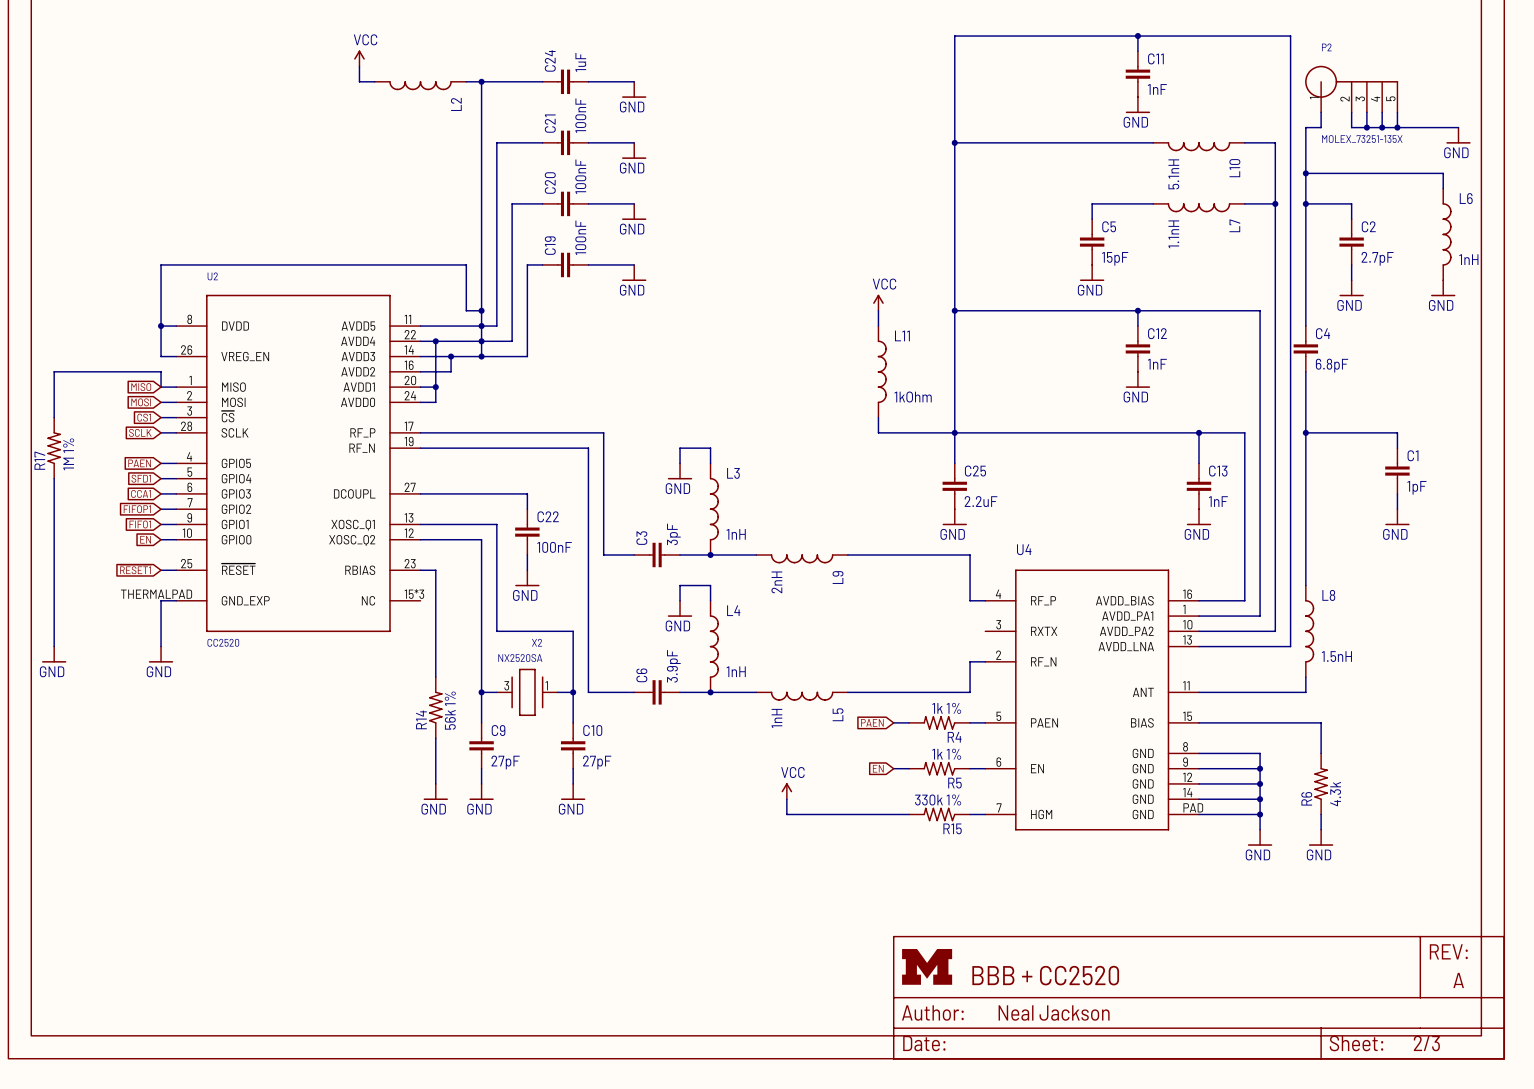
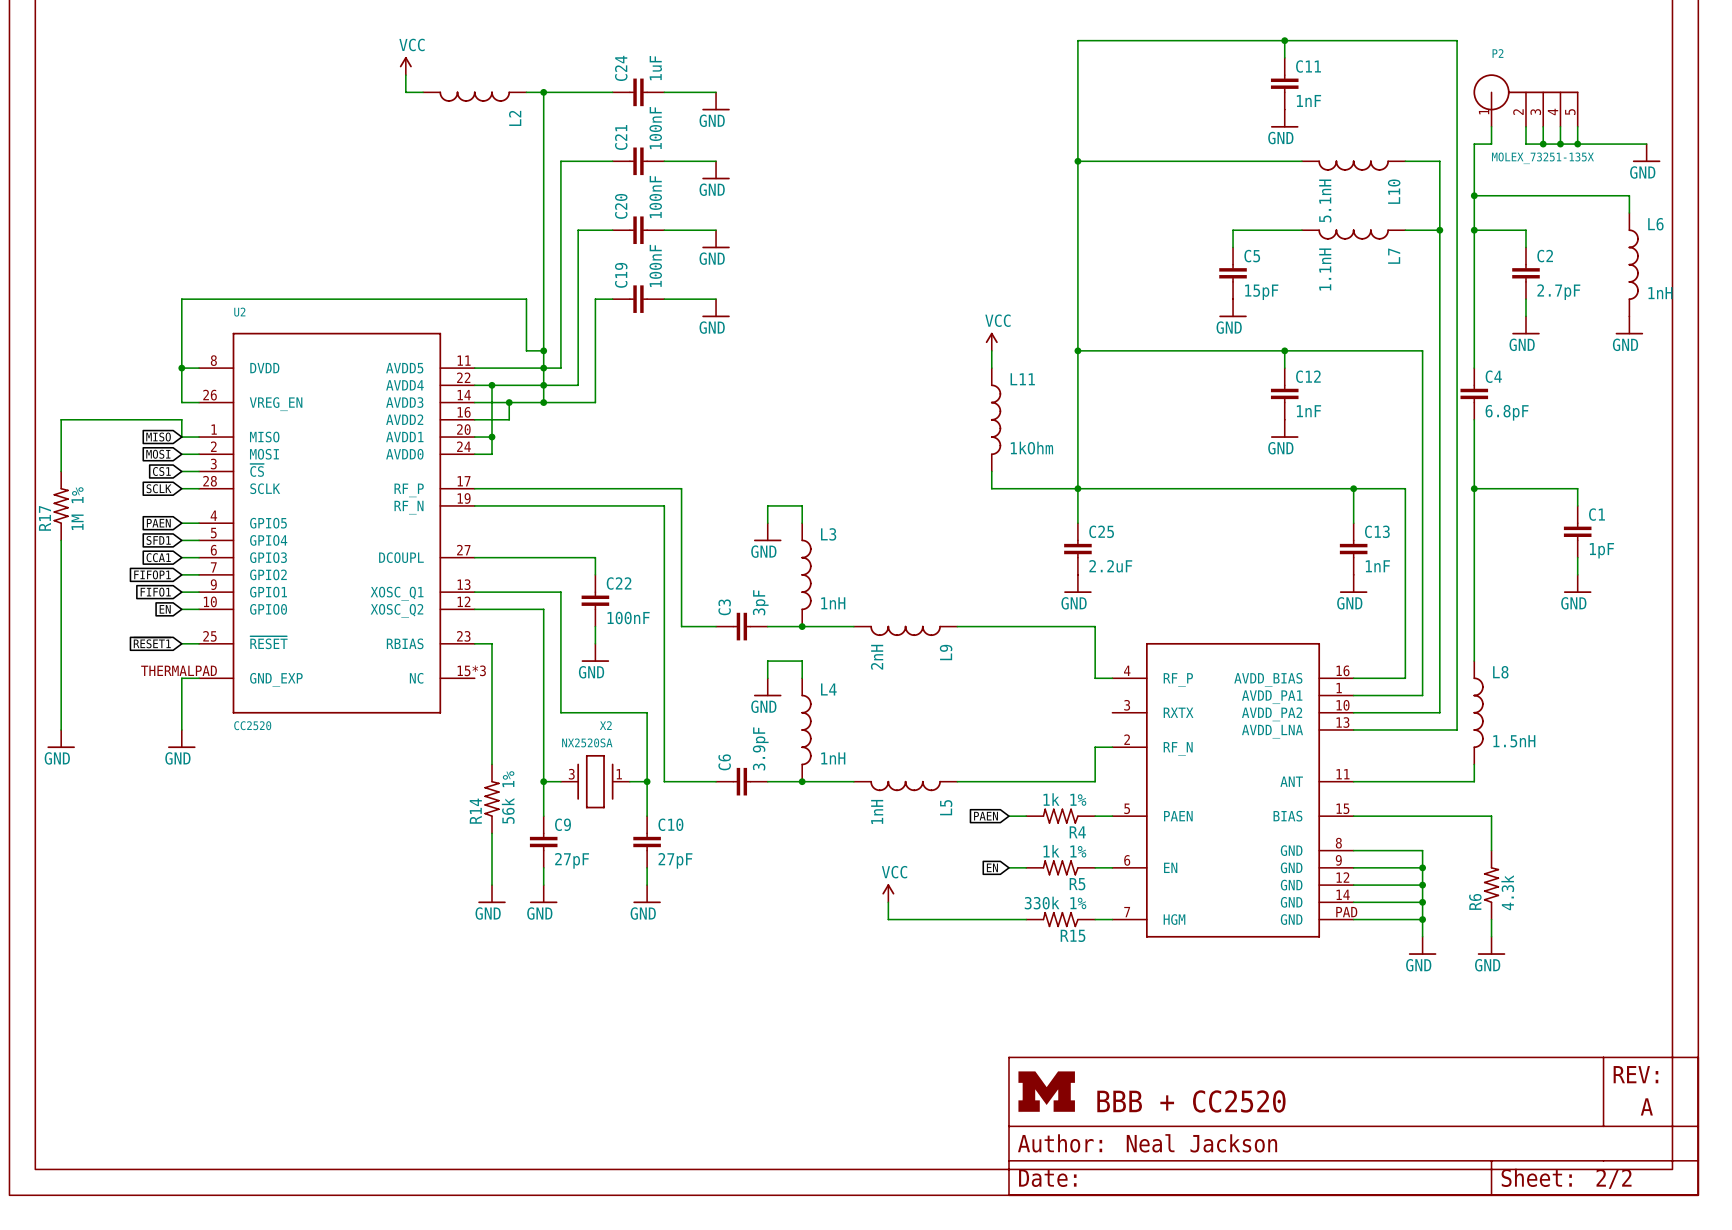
U4 name: U4 (1024, 549) -> none
part text: 2/3 (1426, 1043) -> 2/2 (1614, 1178)

